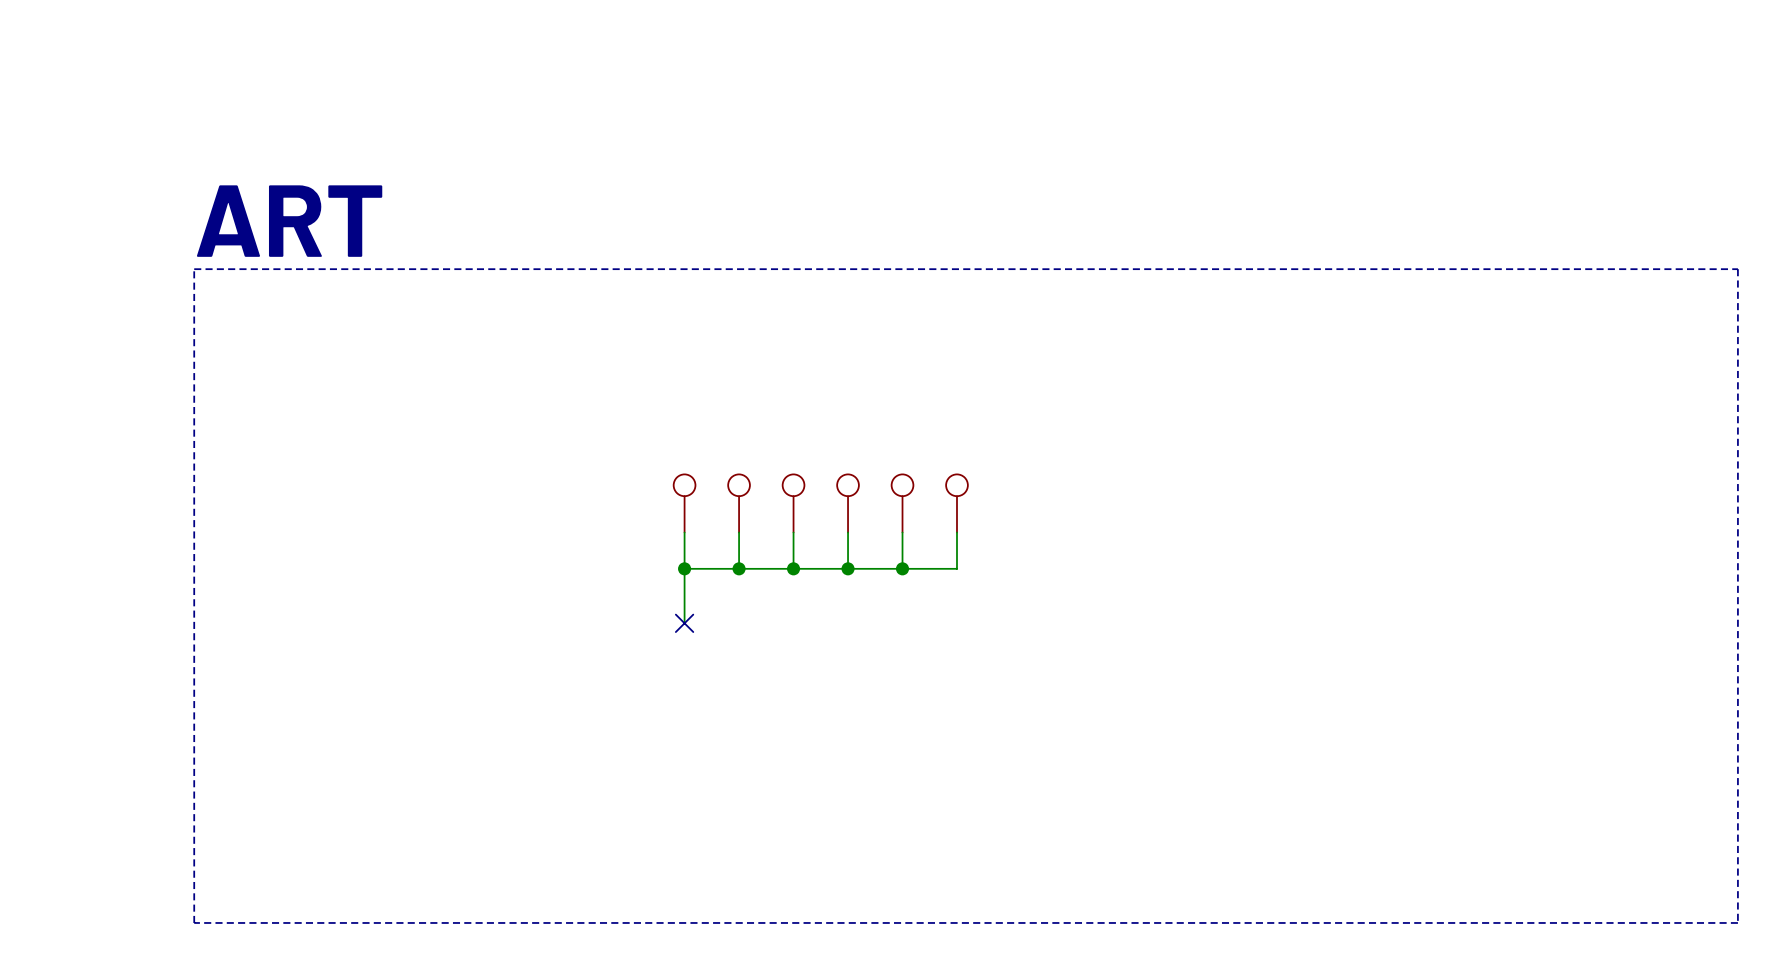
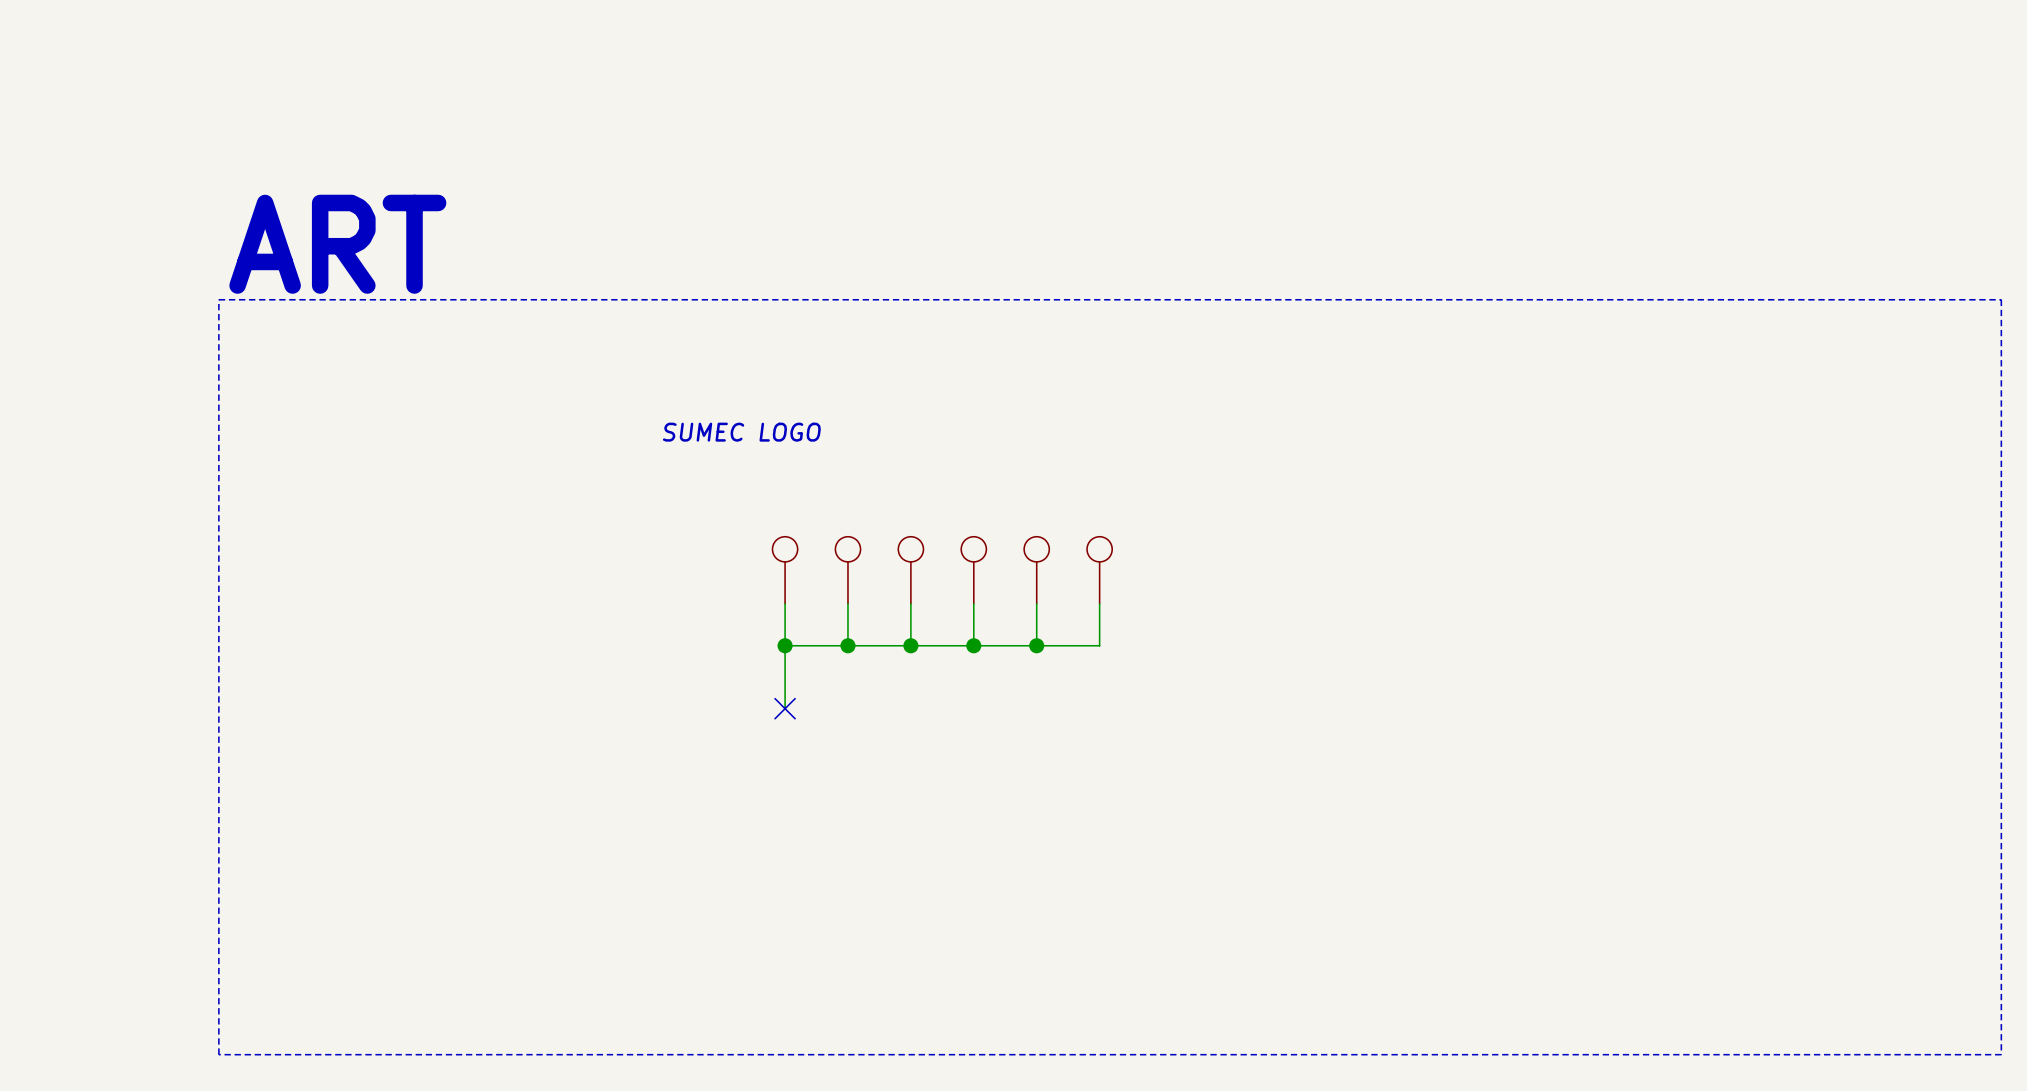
text: none -> SUMEC LOGO (741, 432)

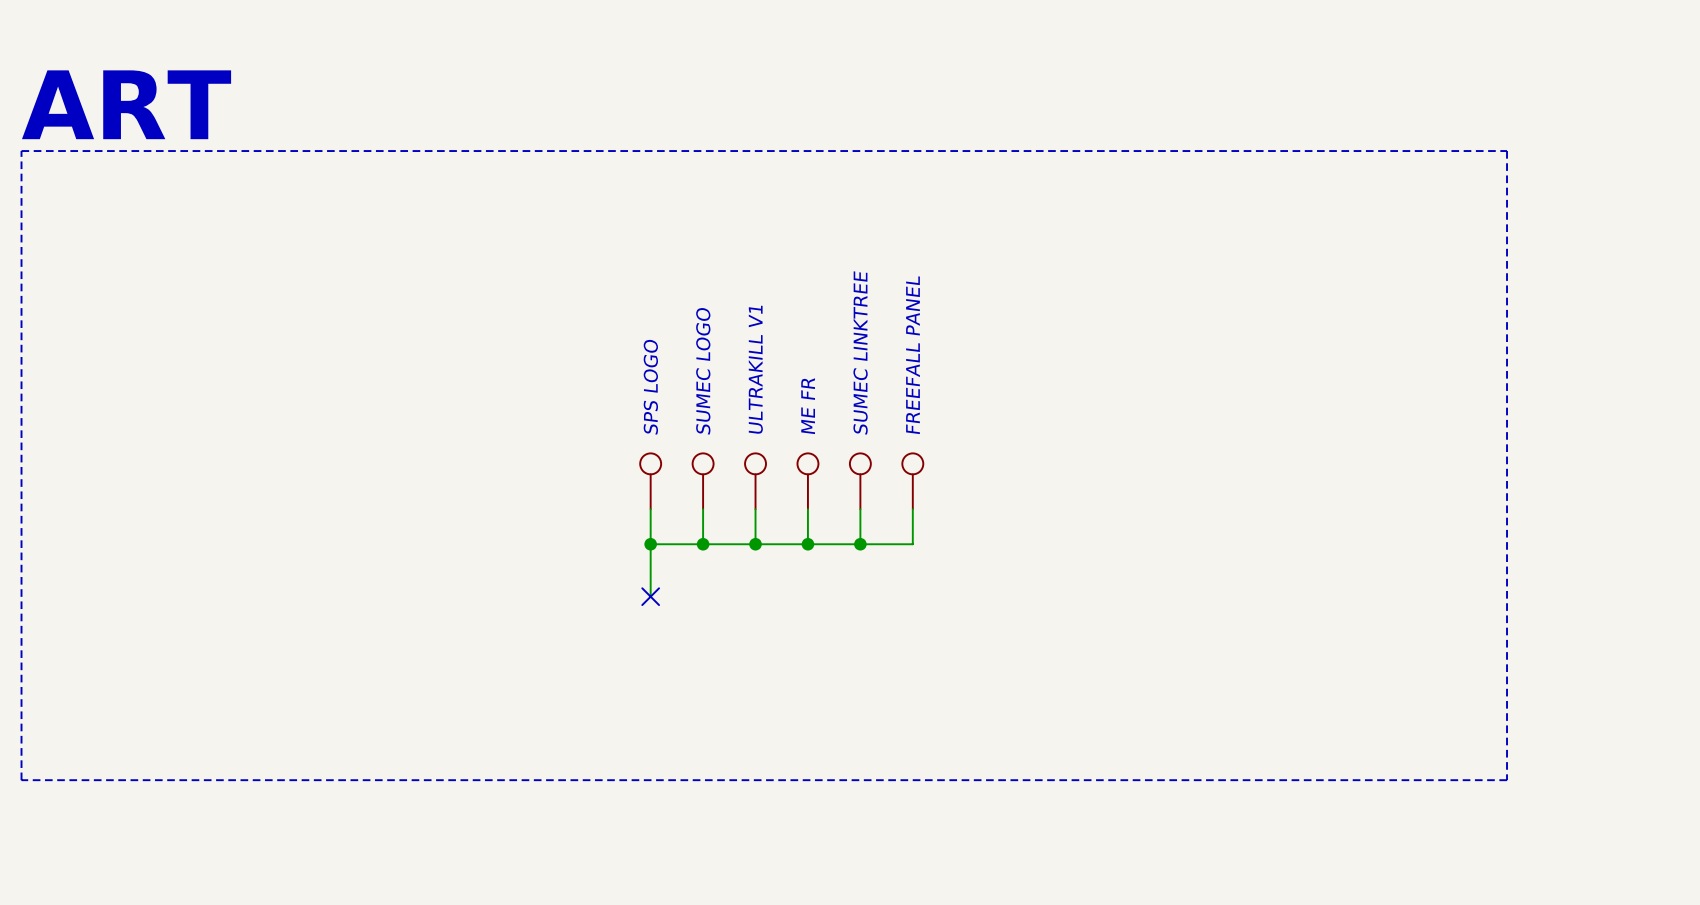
text position: ART (337, 244) -> ART (126, 104)
line: (218, 299) (2001, 299) (2001, 1054) (218, 1054) (218, 299) -> (21, 151) (1507, 151) (1507, 780) (21, 780) (21, 151)
text: none -> SUMEC LINKTREE (860, 352)
text: none -> FREEFALL PANEL (912, 355)
text: none -> ULTRAKILL V1 (755, 369)
text rotation: 0° (741, 432) -> 90° counterclockwise (703, 371)
text: none -> SPS LOGO (650, 387)
text: none -> ME FR (808, 406)

